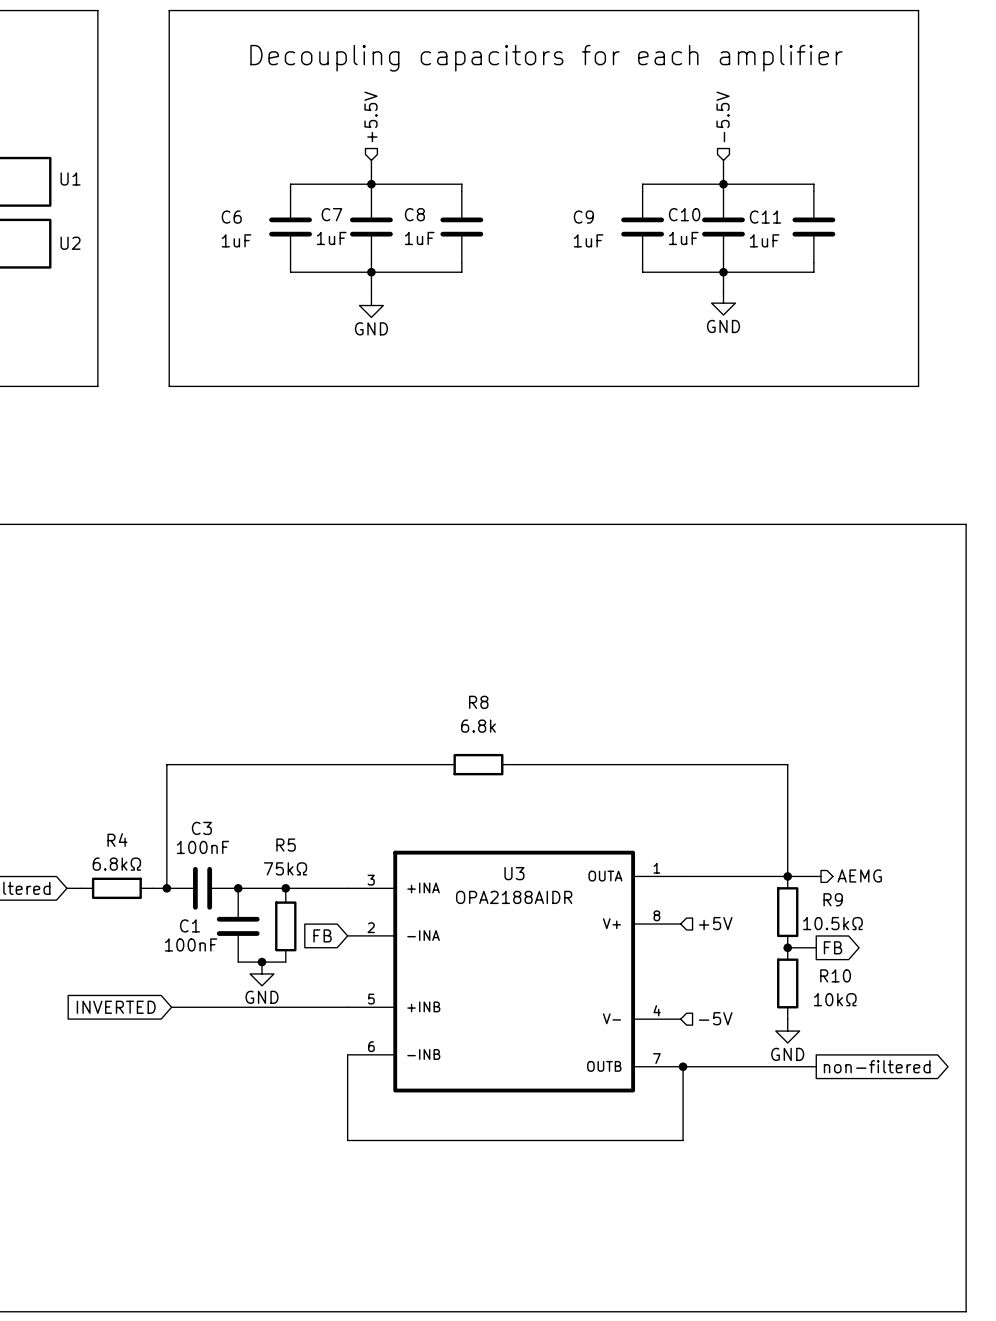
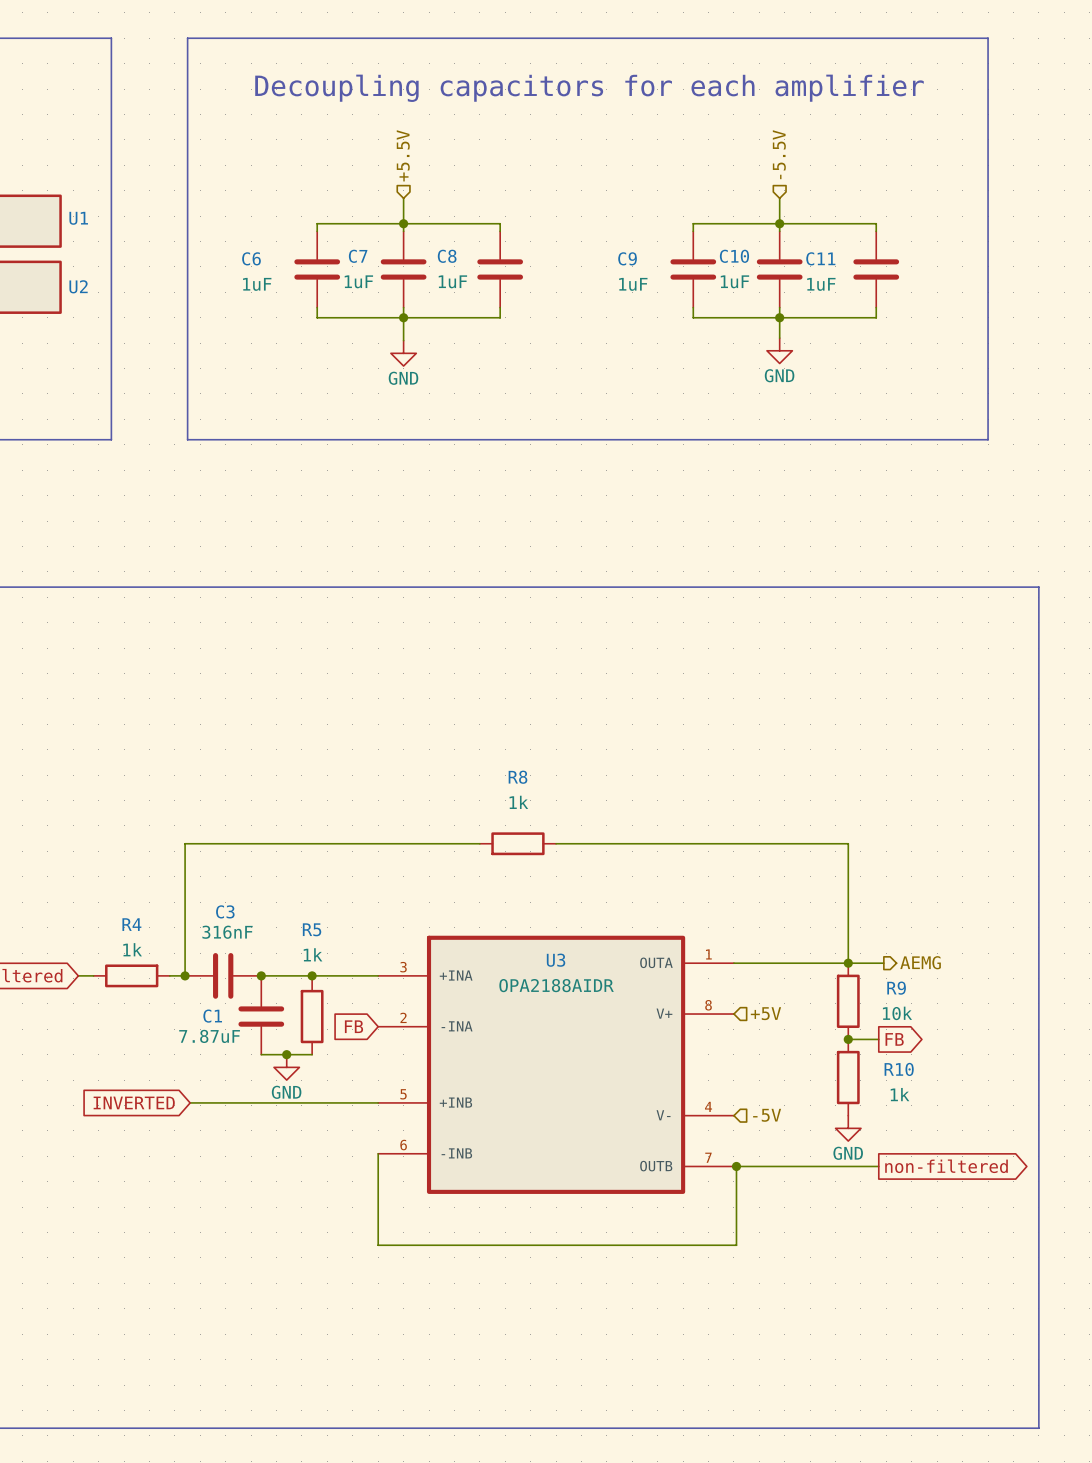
R8 value: 6.8k (478, 726) -> 1k (518, 802)
C3 value: 100nF (202, 847) -> 316nF (227, 932)
R4 value: 6.8kΩ (116, 864) -> 1k (132, 949)
R5 value: 75kΩ (285, 868) -> 1k (313, 954)
R9 value: 10.5kΩ (832, 923) -> 10k (897, 1013)
C1 value: 100nF (191, 944) -> 7.87uF (209, 1036)
R10 value: 10kΩ (835, 999) -> 1k (900, 1094)

